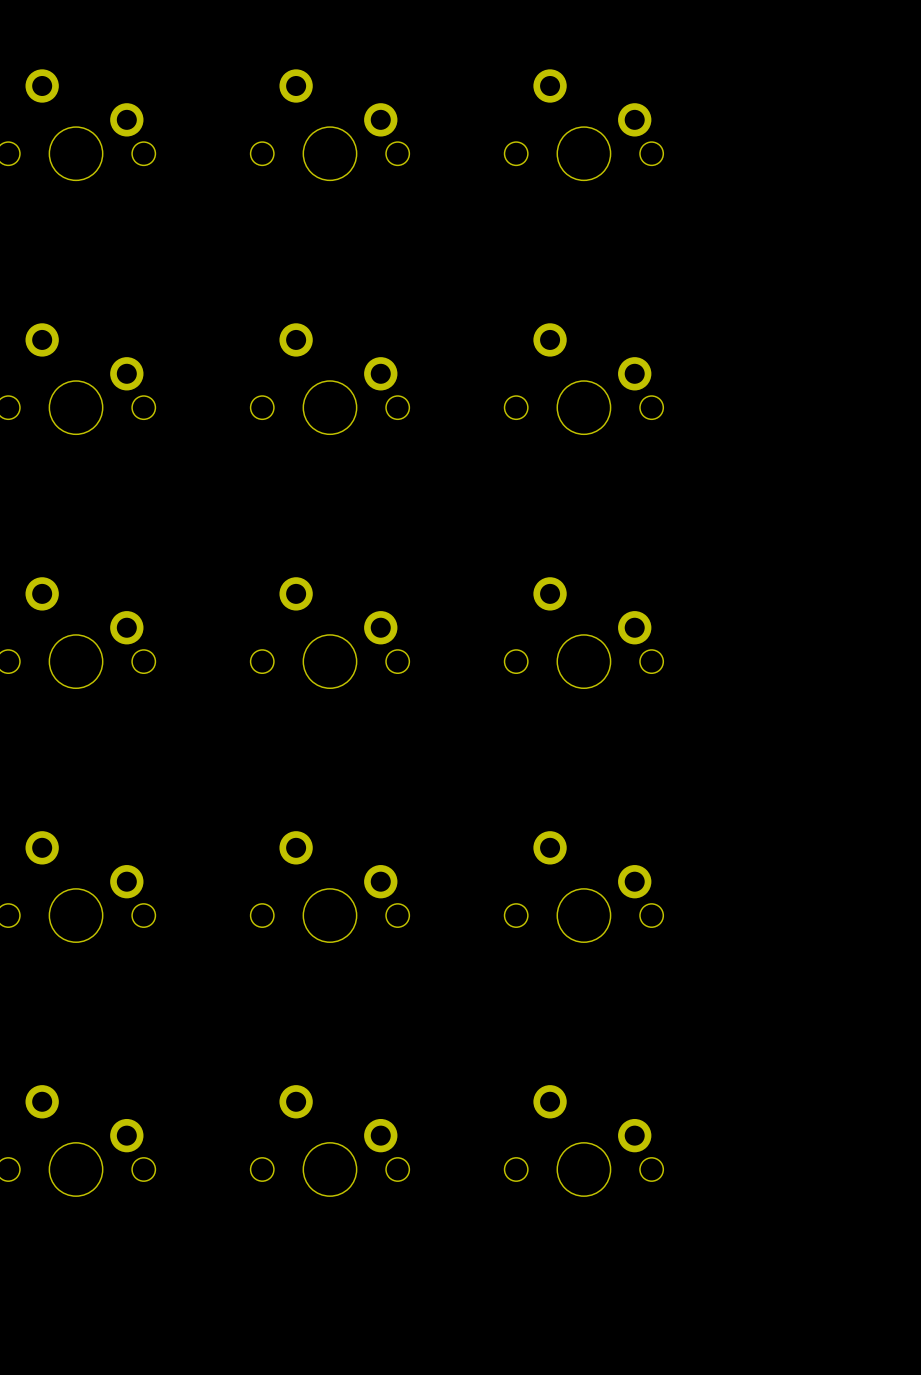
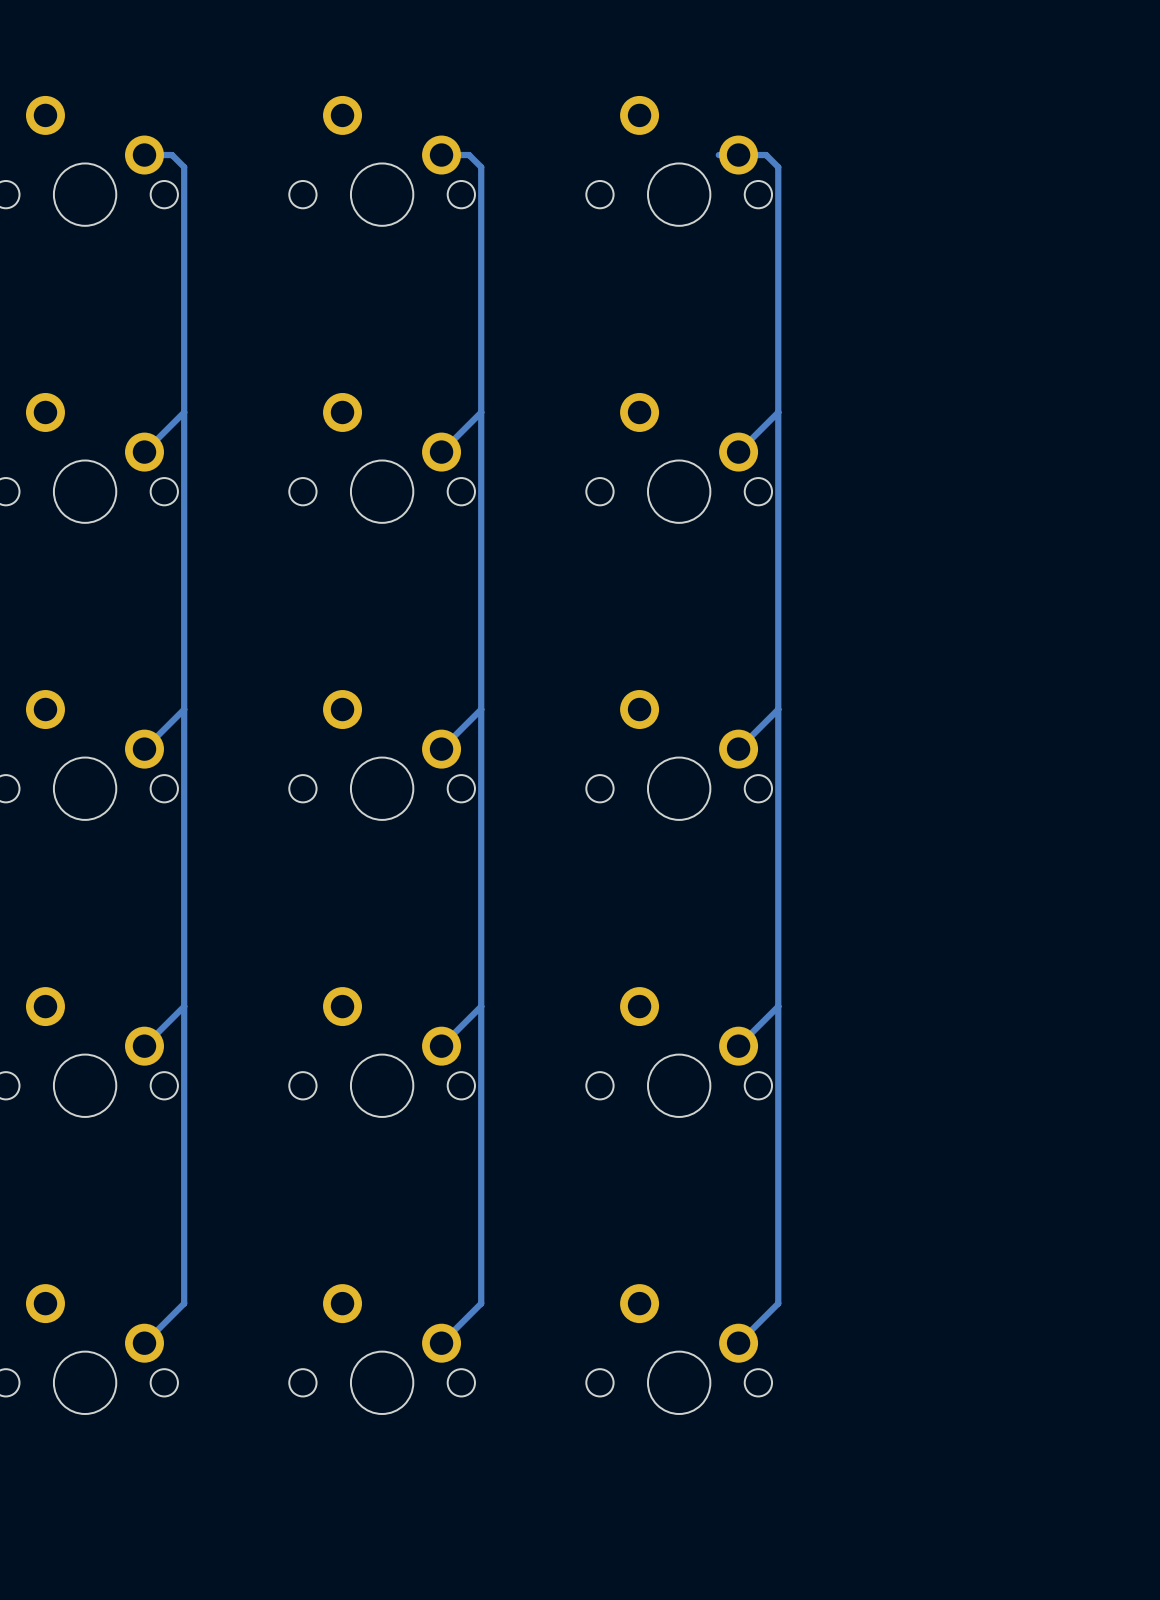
track: none -> (144, 155) (172, 155) (184, 167) (184, 1303) (144, 1343)
track: none -> (441, 155) (469, 155) (481, 167) (481, 1303) (441, 1343)
track: none -> (718, 155) (766, 155) (778, 167) (778, 1303) (738, 1343)
track: none -> (184, 412) (144, 452)
track: none -> (481, 412) (441, 452)
track: none -> (778, 412) (738, 452)
track: none -> (184, 709) (144, 749)
track: none -> (481, 709) (441, 749)
track: none -> (778, 709) (738, 749)
track: none -> (184, 1006) (144, 1046)
track: none -> (481, 1006) (441, 1046)
track: none -> (778, 1006) (738, 1046)

